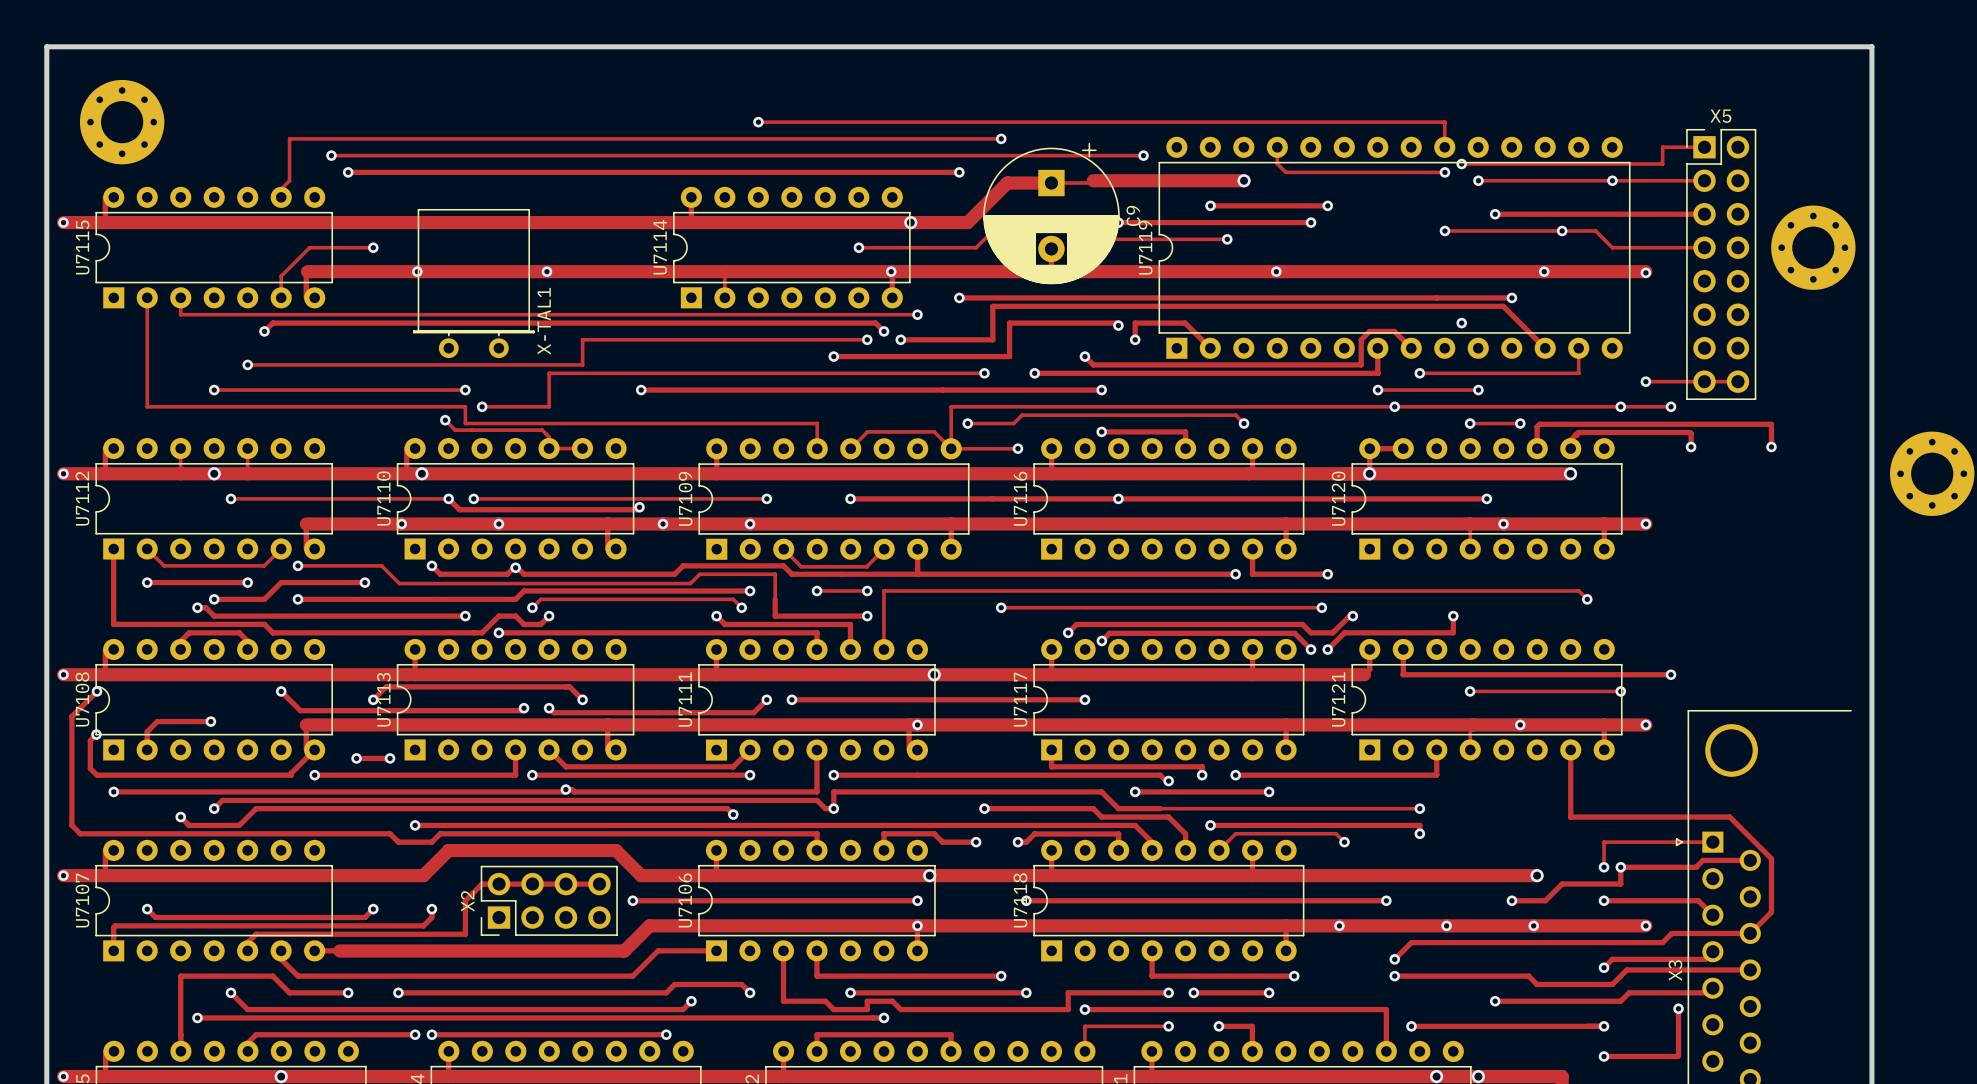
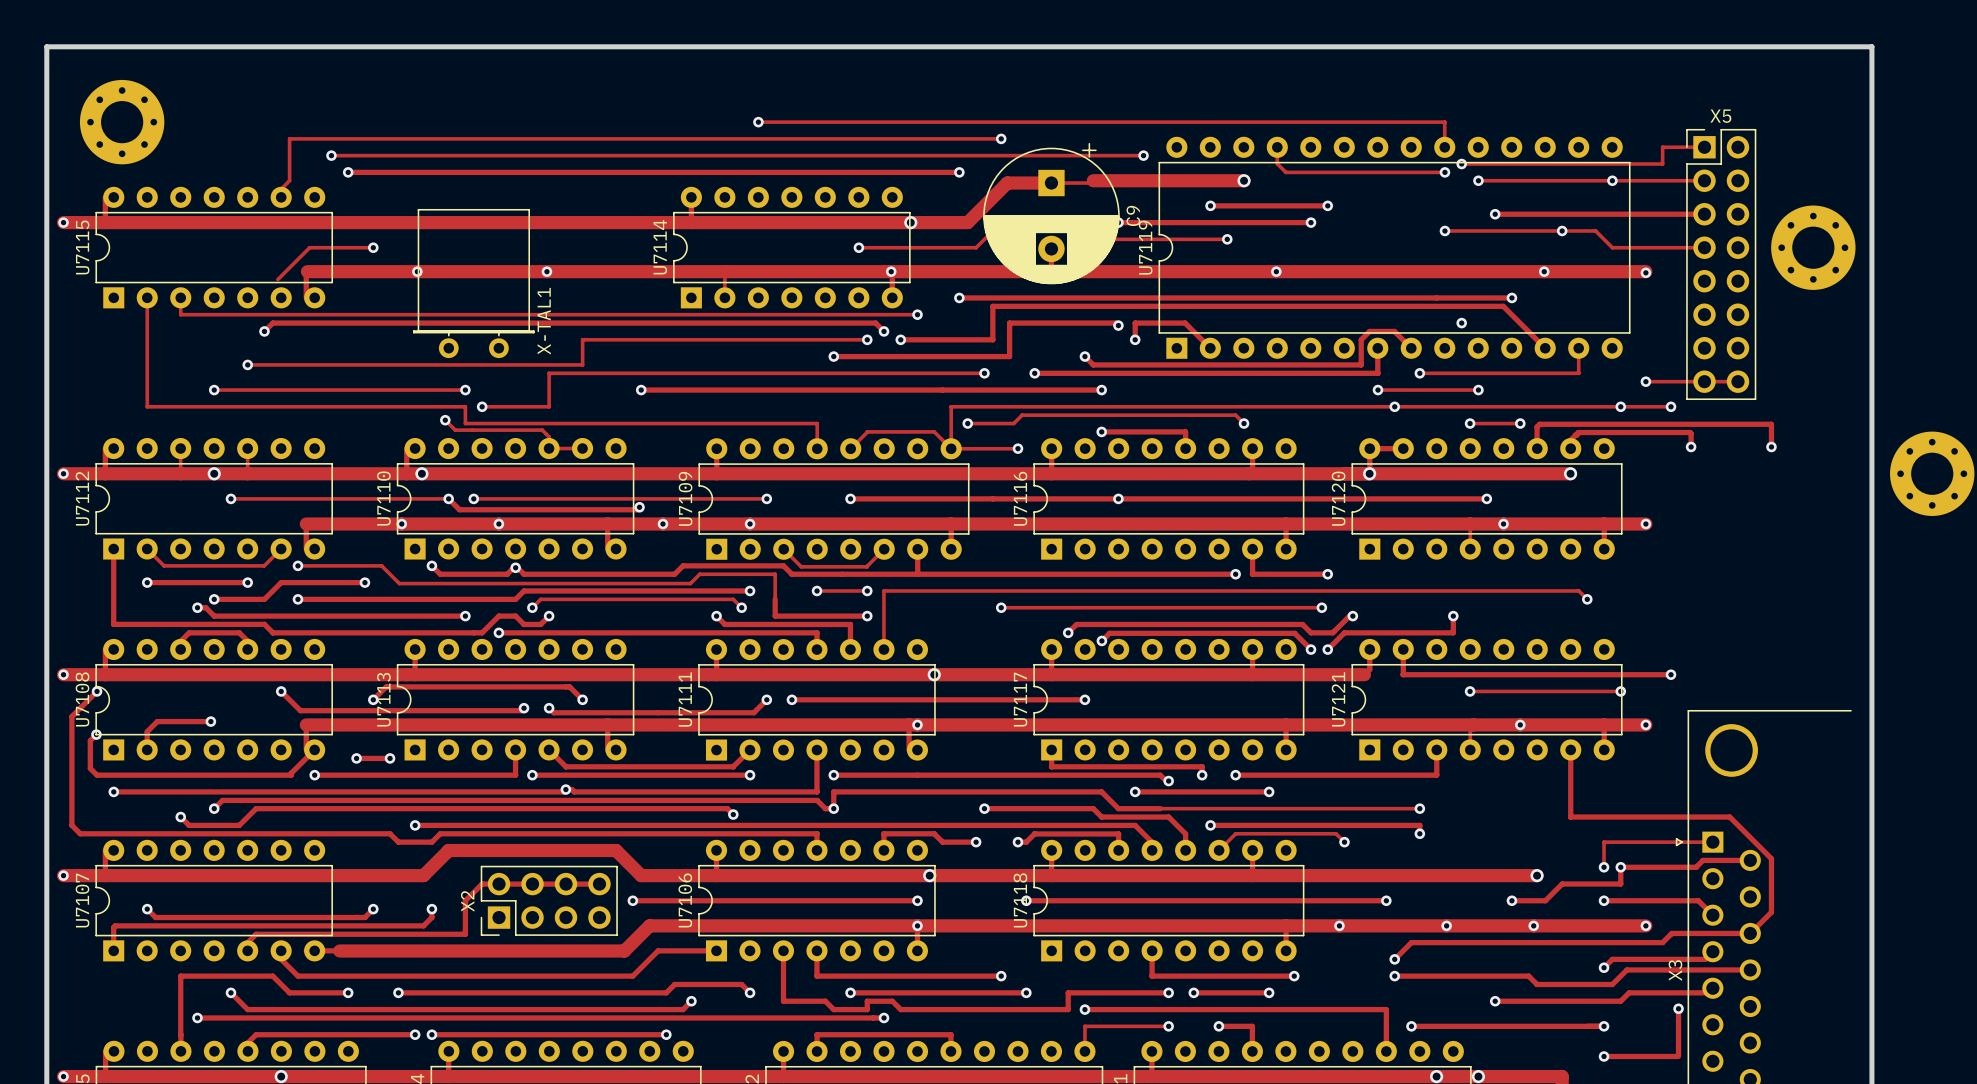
track: (281, 276) (281, 297) -> (281, 276) (277, 279)

